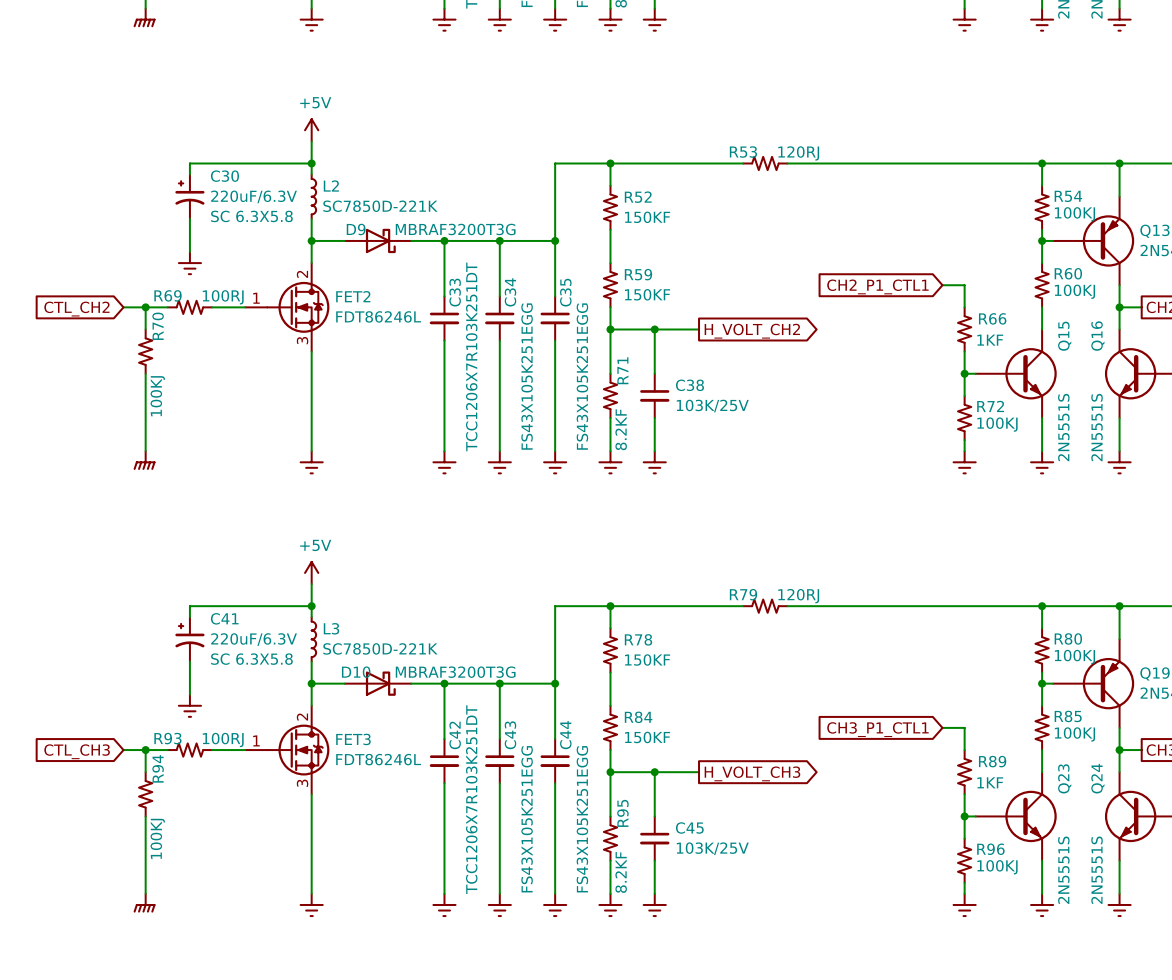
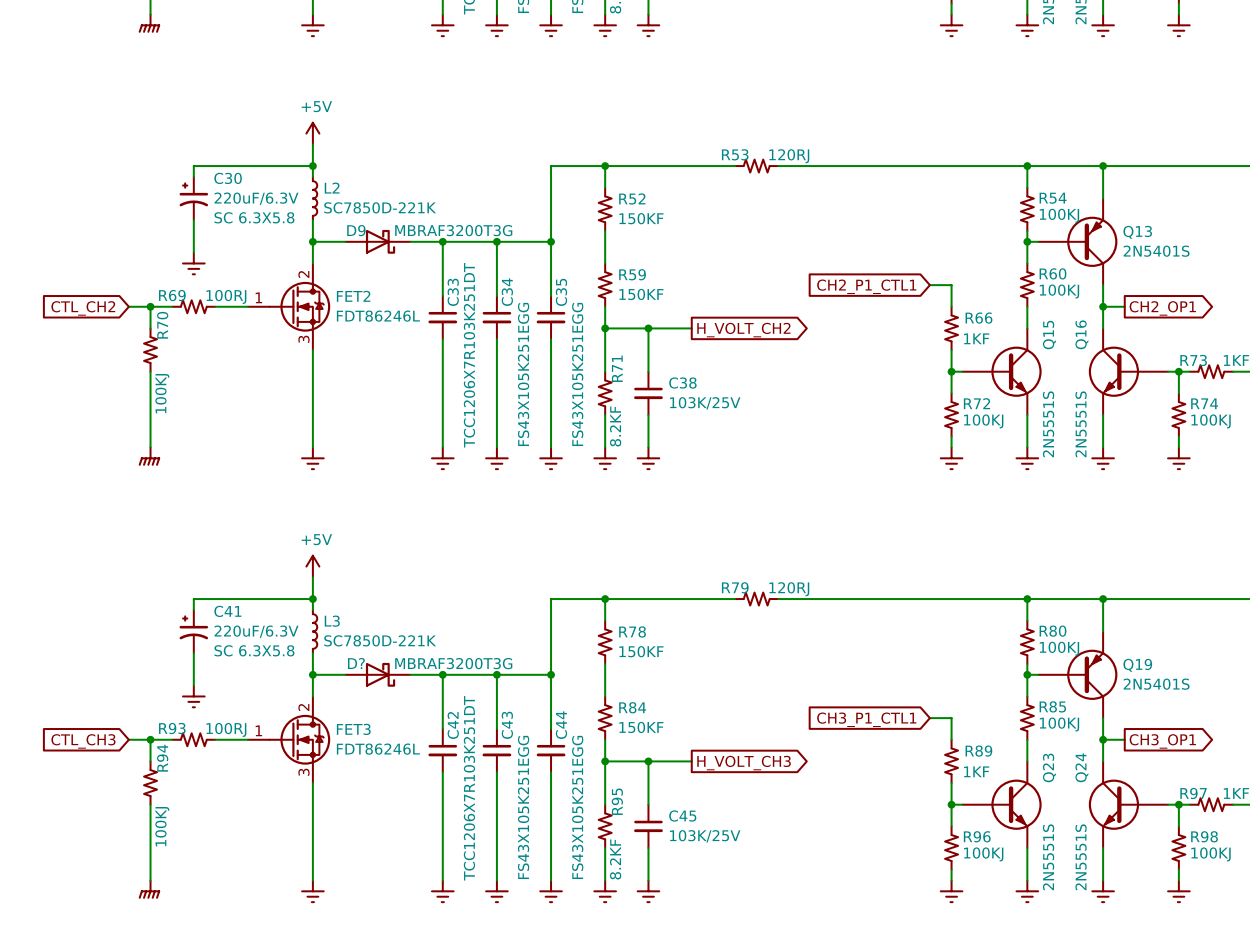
D10 name: D10 (356, 672) -> D? (356, 663)

